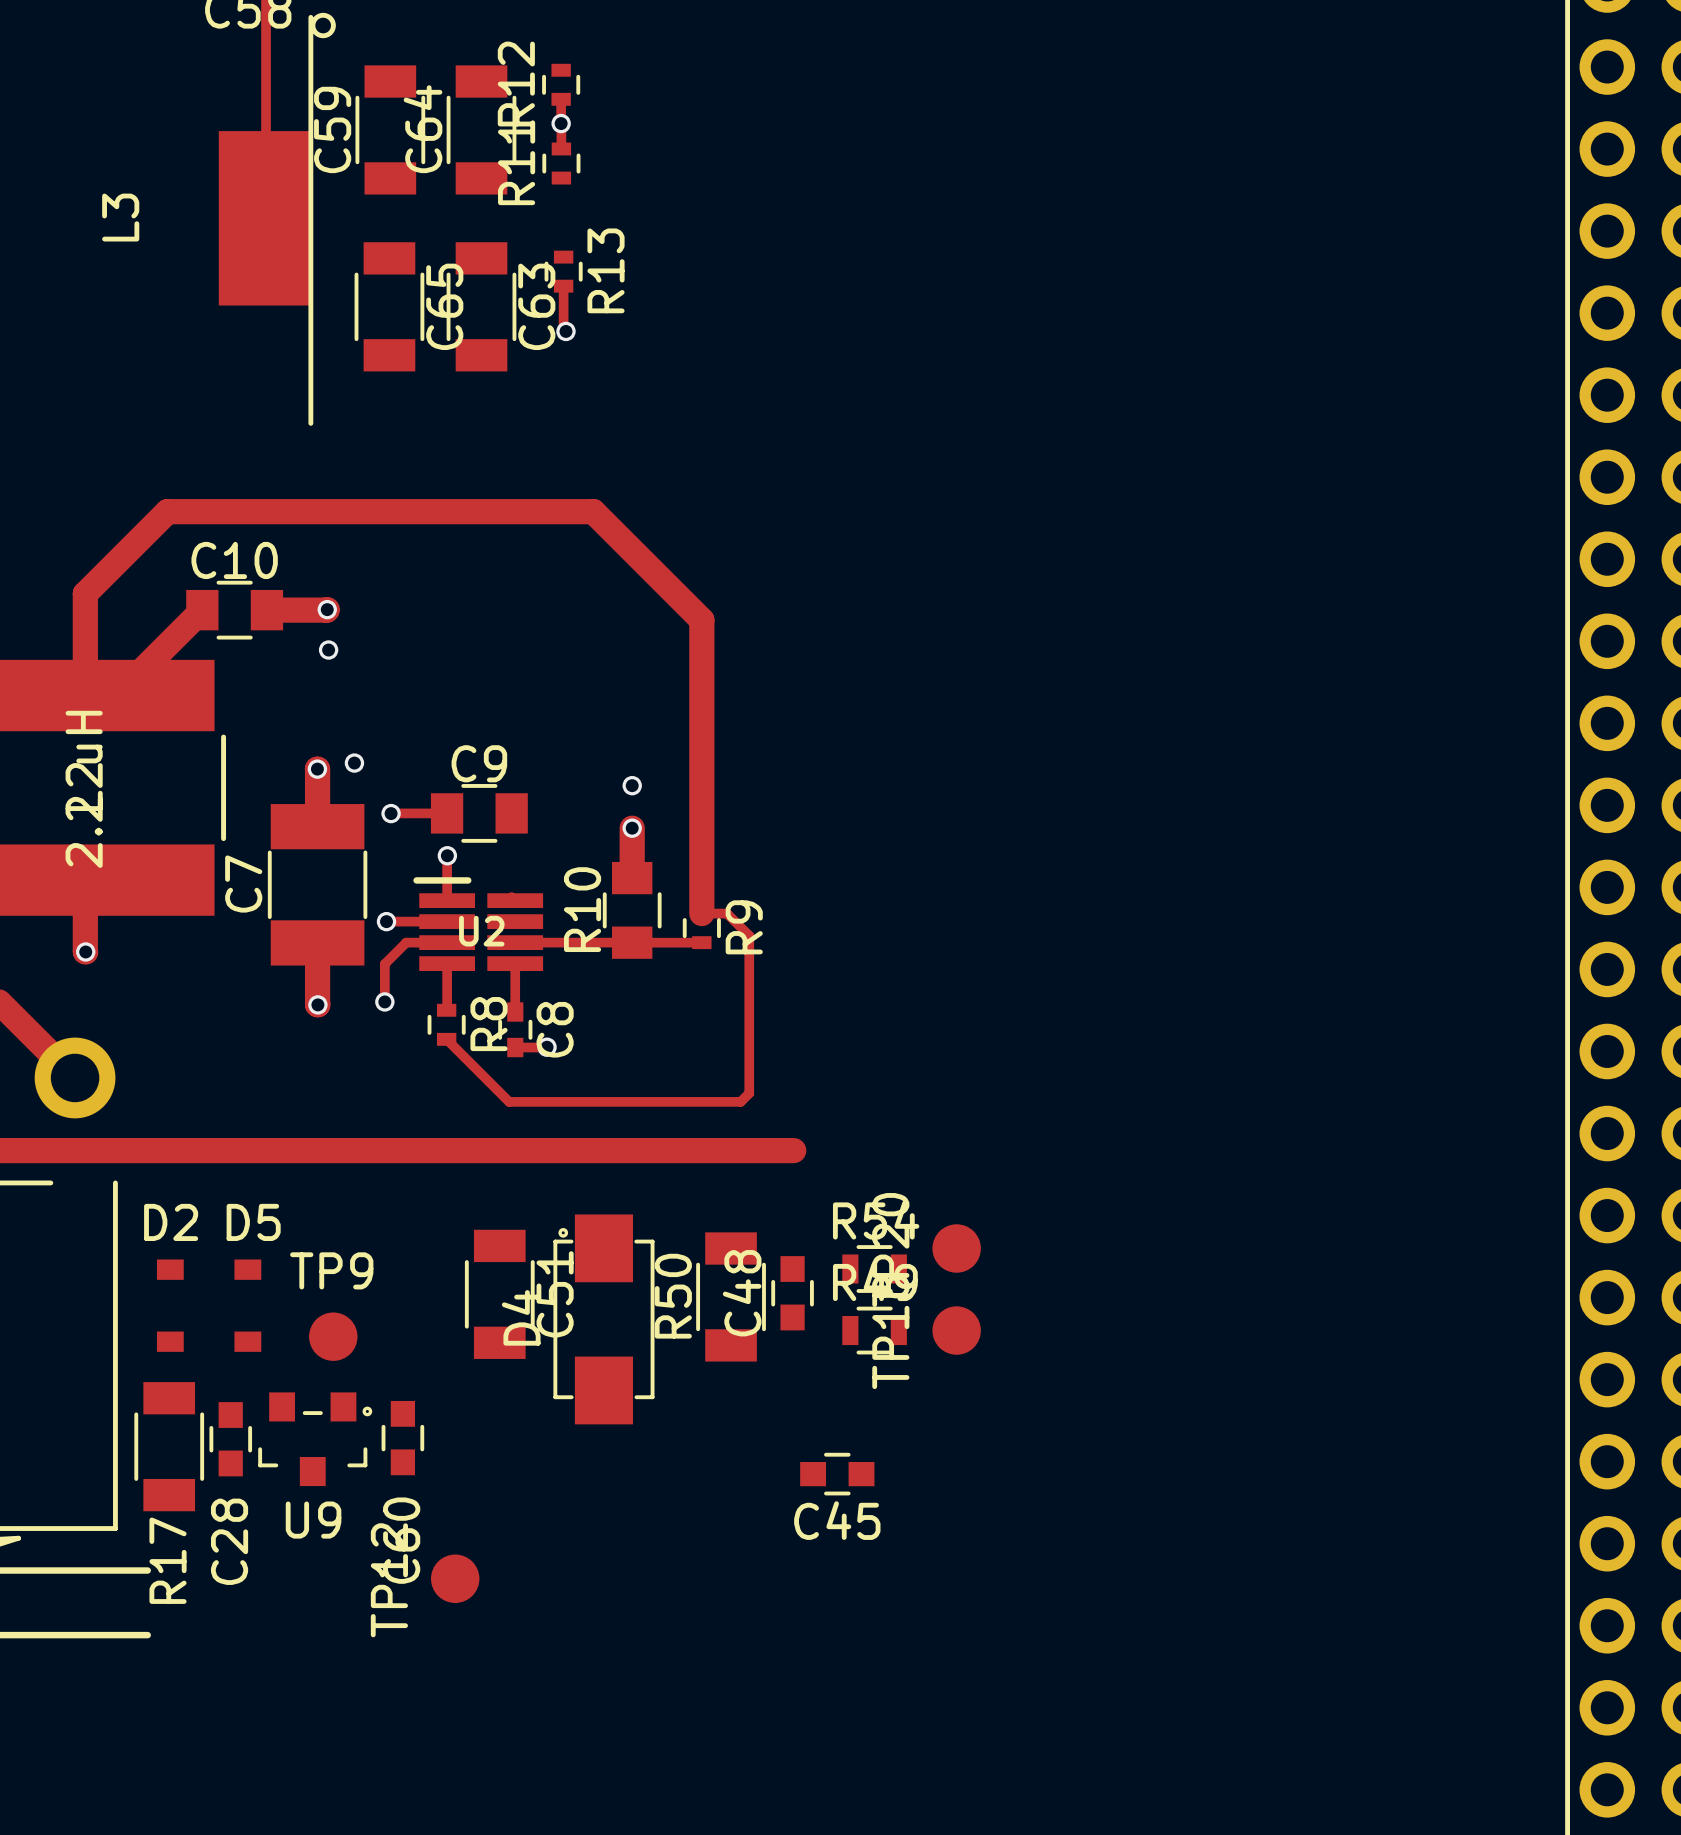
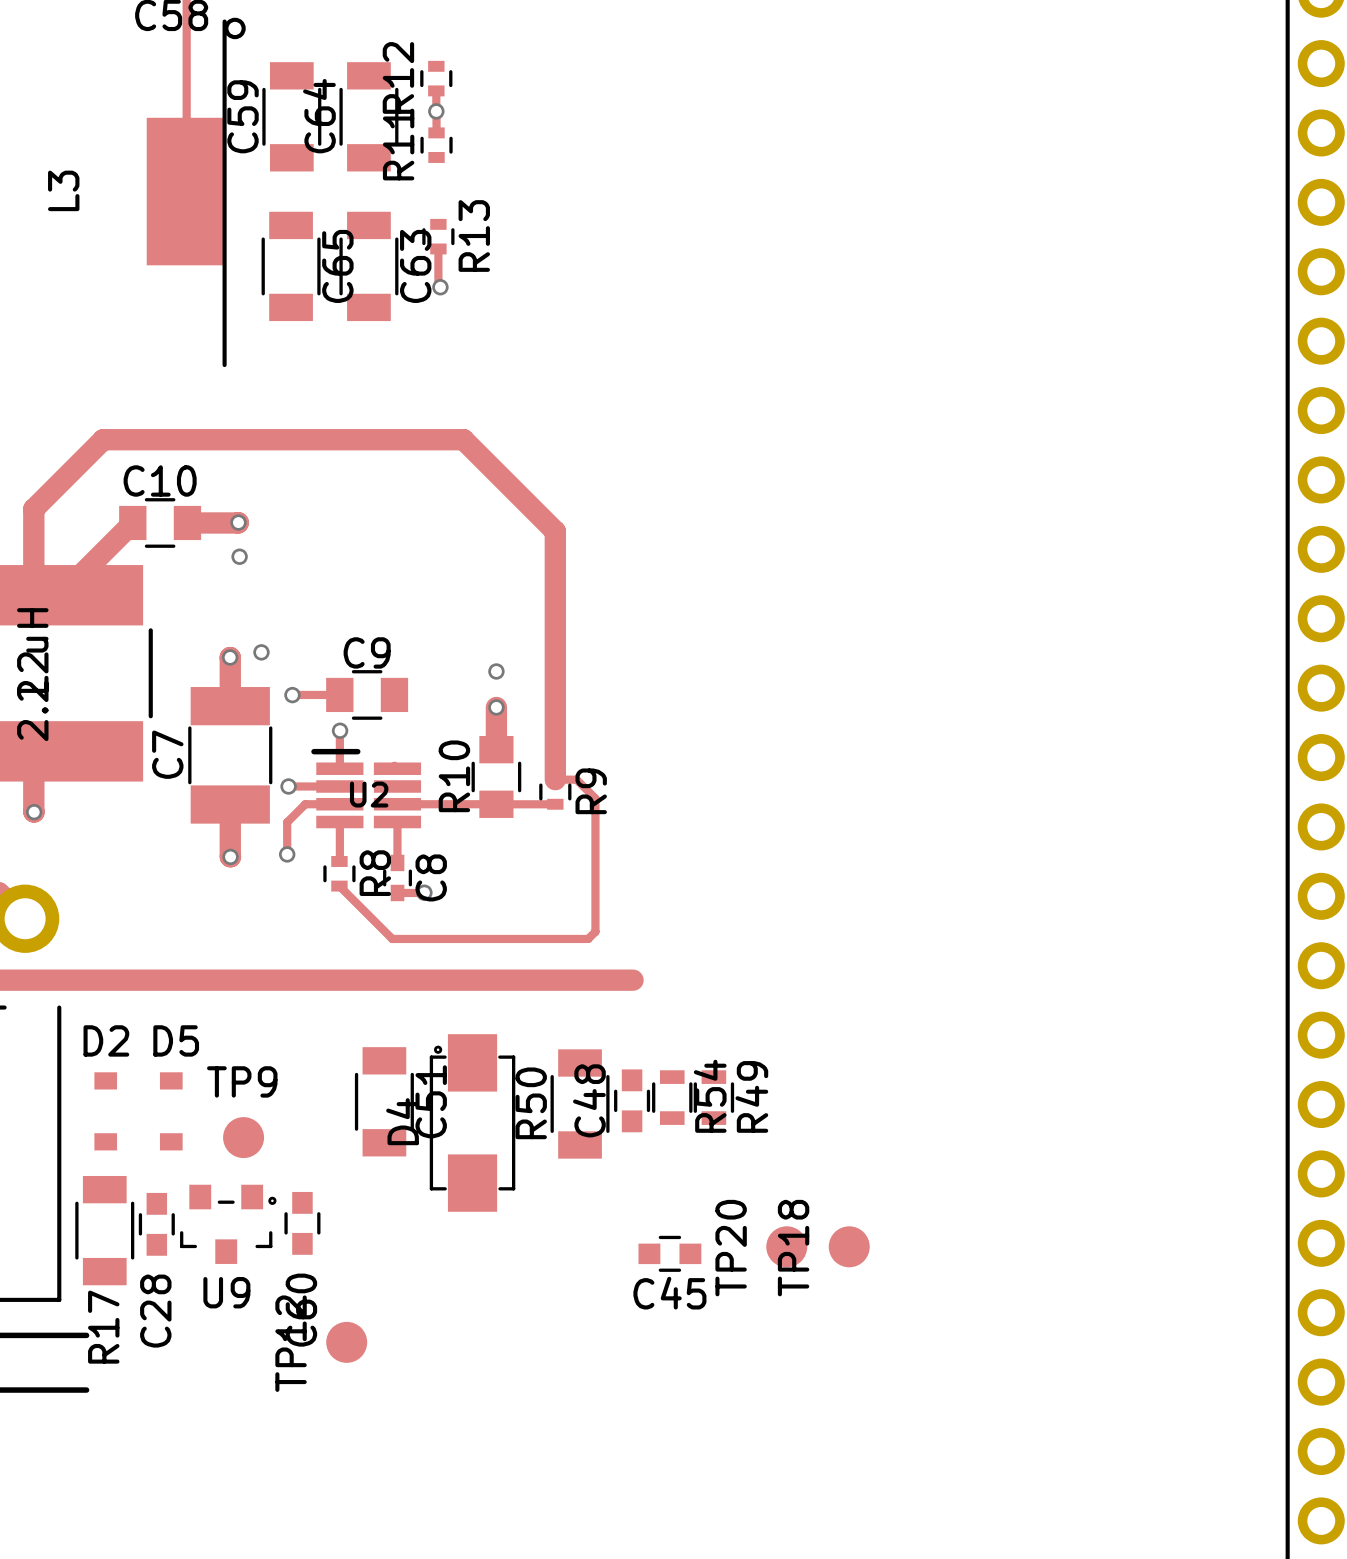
TP20 position: (956, 1248) -> (786, 1246)
R54 rotation: 0° (874, 1269) -> 90° clockwise (672, 1097)
R54 position: (874, 1269) -> (672, 1097)
R49 rotation: 0° (874, 1330) -> 90° clockwise (713, 1097)
R49 position: (874, 1330) -> (713, 1097)
TP18 position: (956, 1330) -> (849, 1246)

